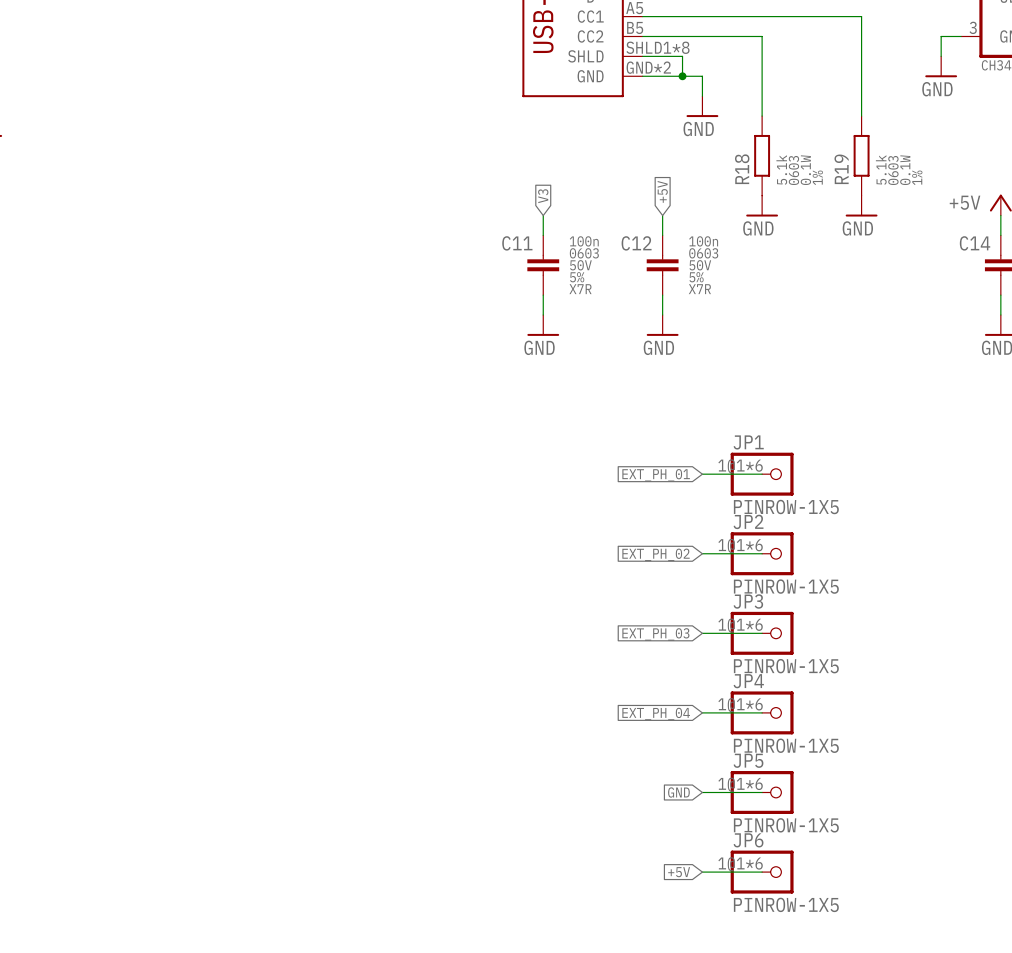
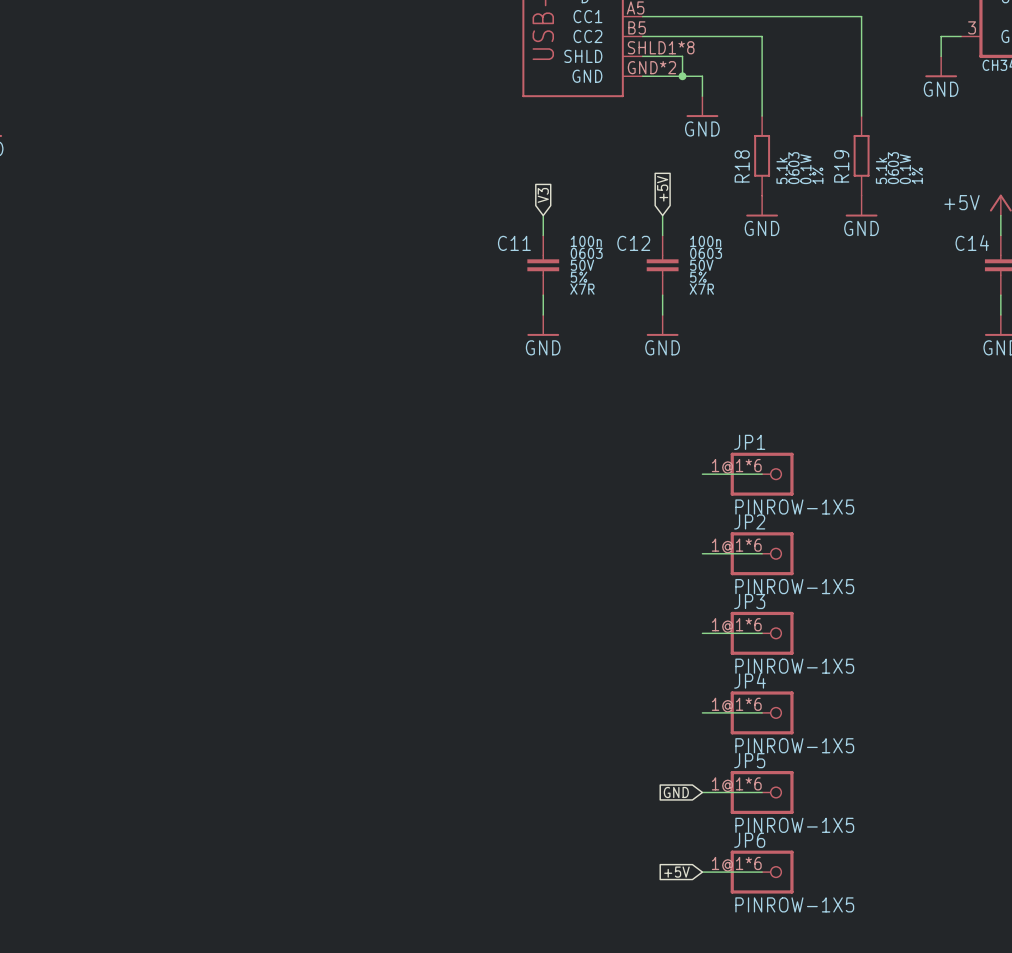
global label: EXT_PH_01 (656, 475) -> none
global label: EXT_PH_02 (656, 554) -> none
global label: EXT_PH_03 (655, 634) -> none
global label: EXT_PH_04 (656, 714) -> none

